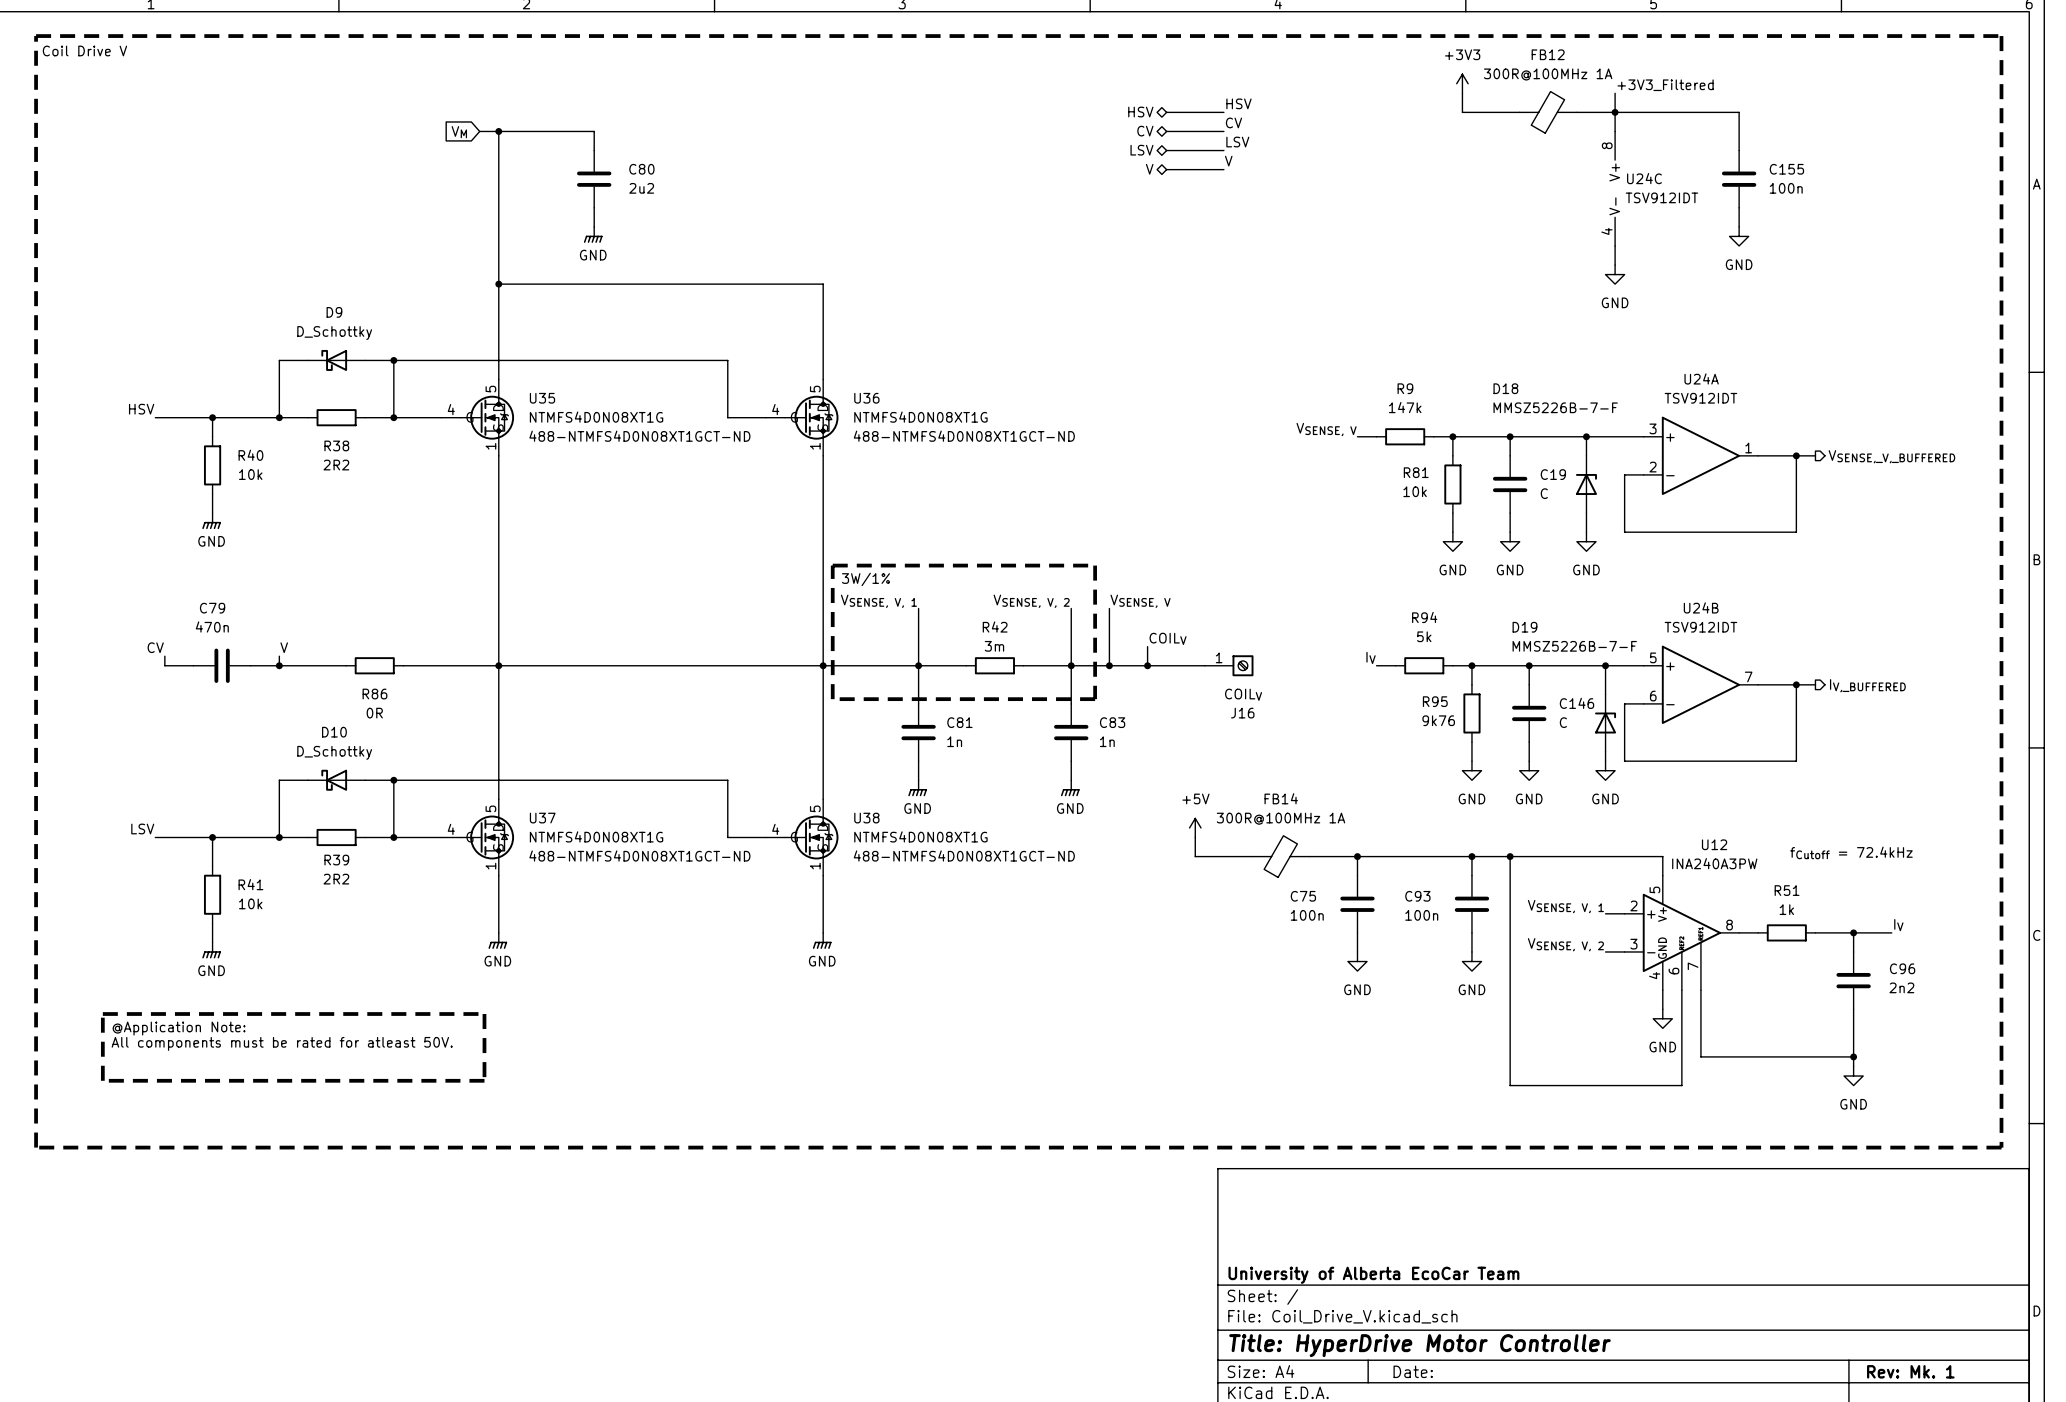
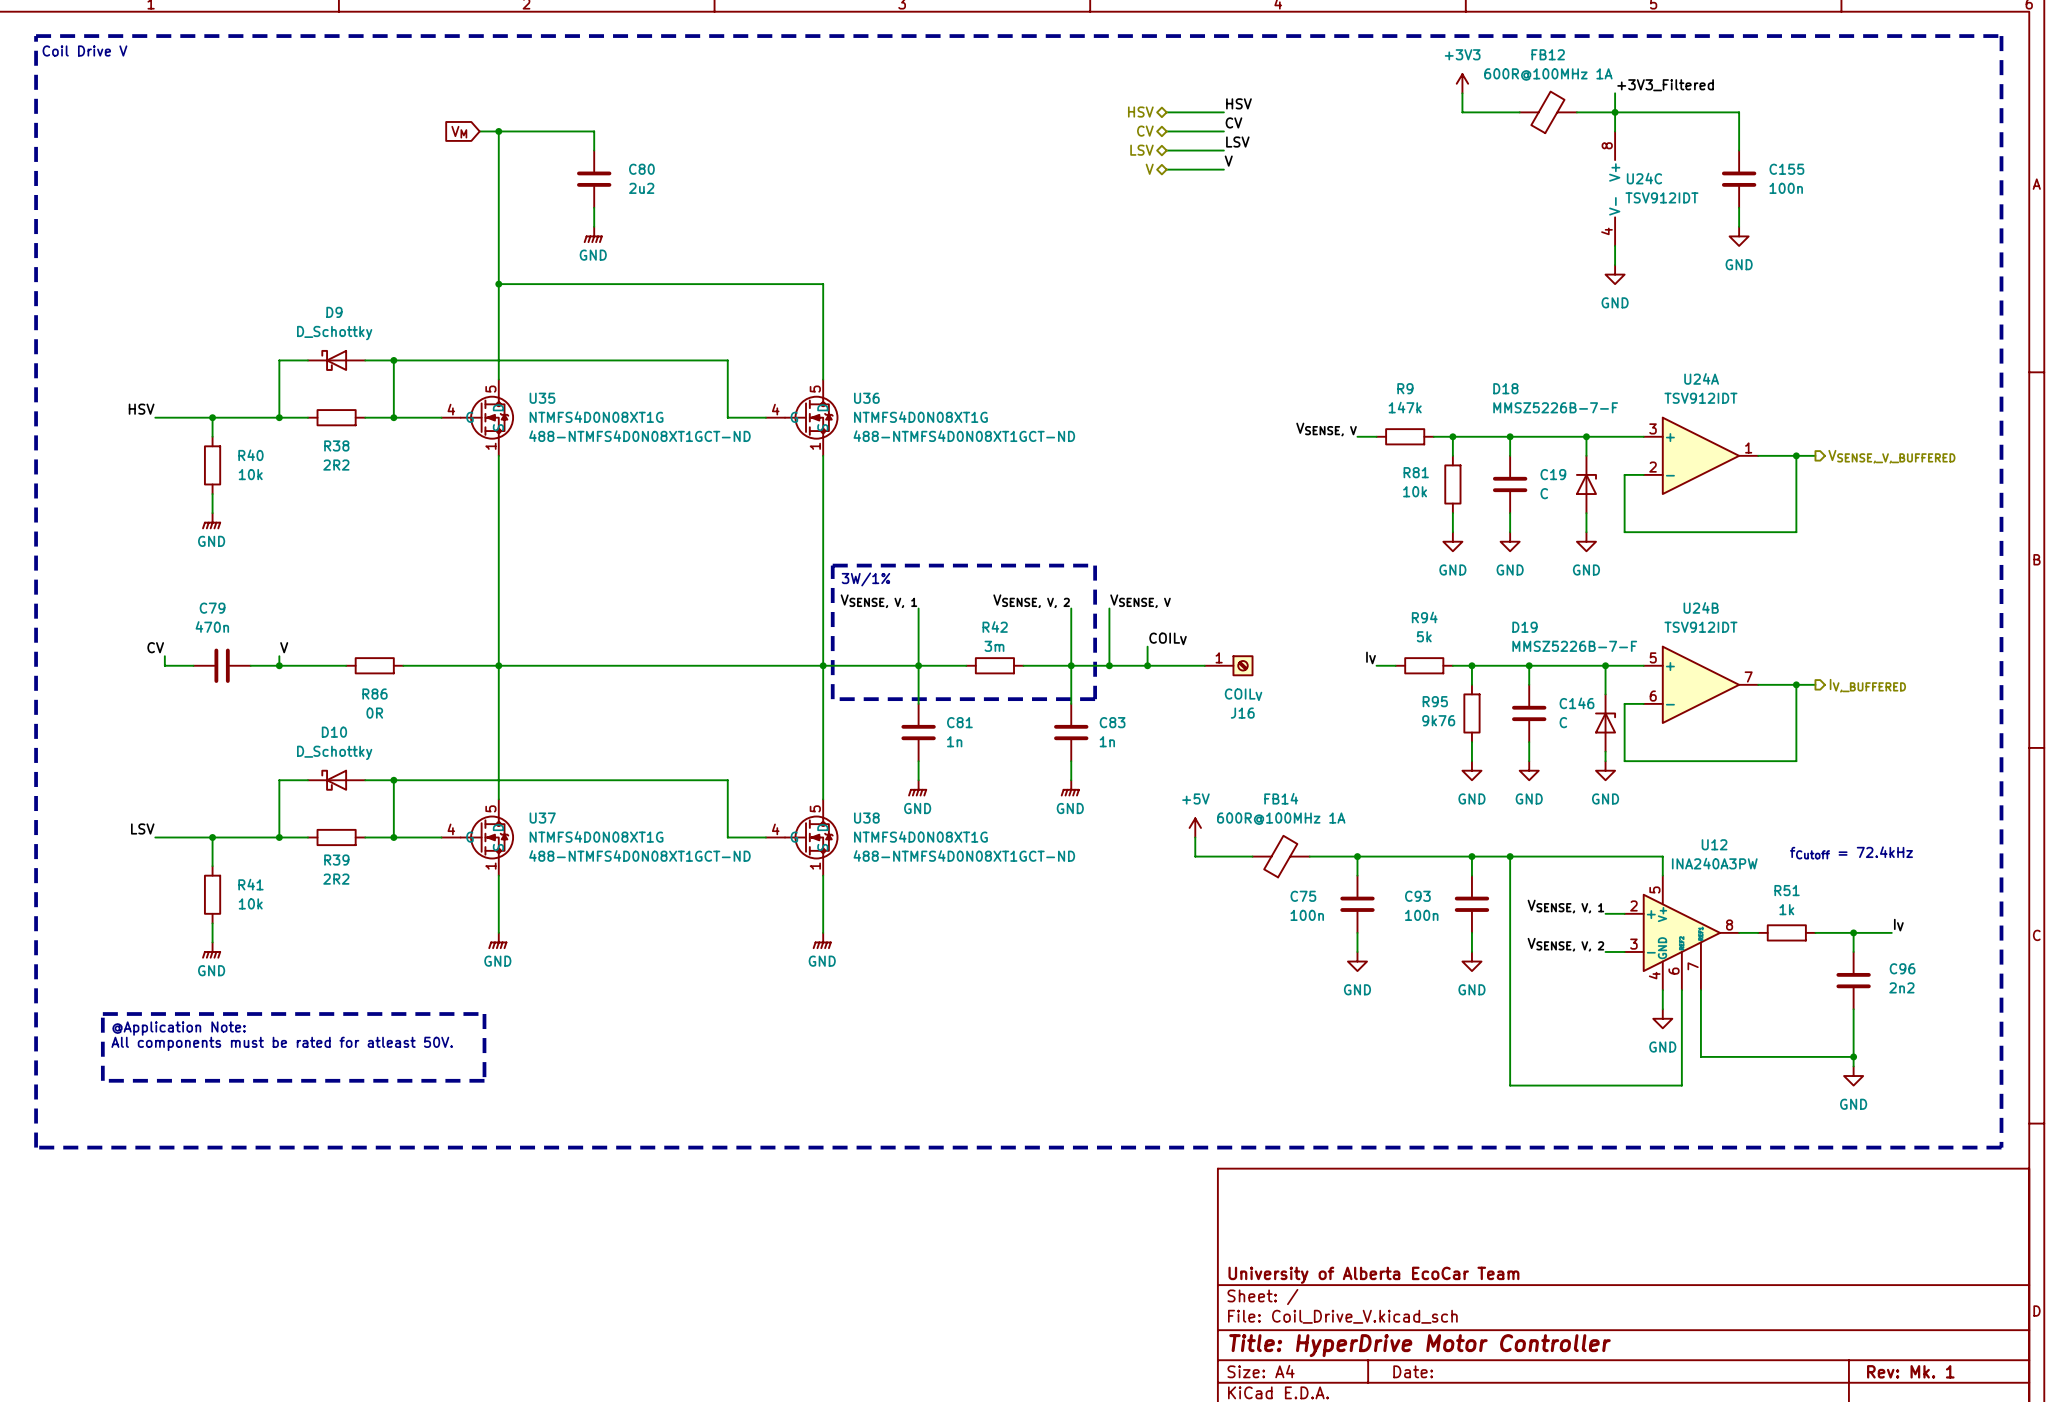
FB12 value: 300R@100MHz 1A (1548, 74) -> 600R@100MHz 1A (1548, 74)
FB14 value: 300R@100MHz 1A (1281, 818) -> 600R@100MHz 1A (1281, 818)

